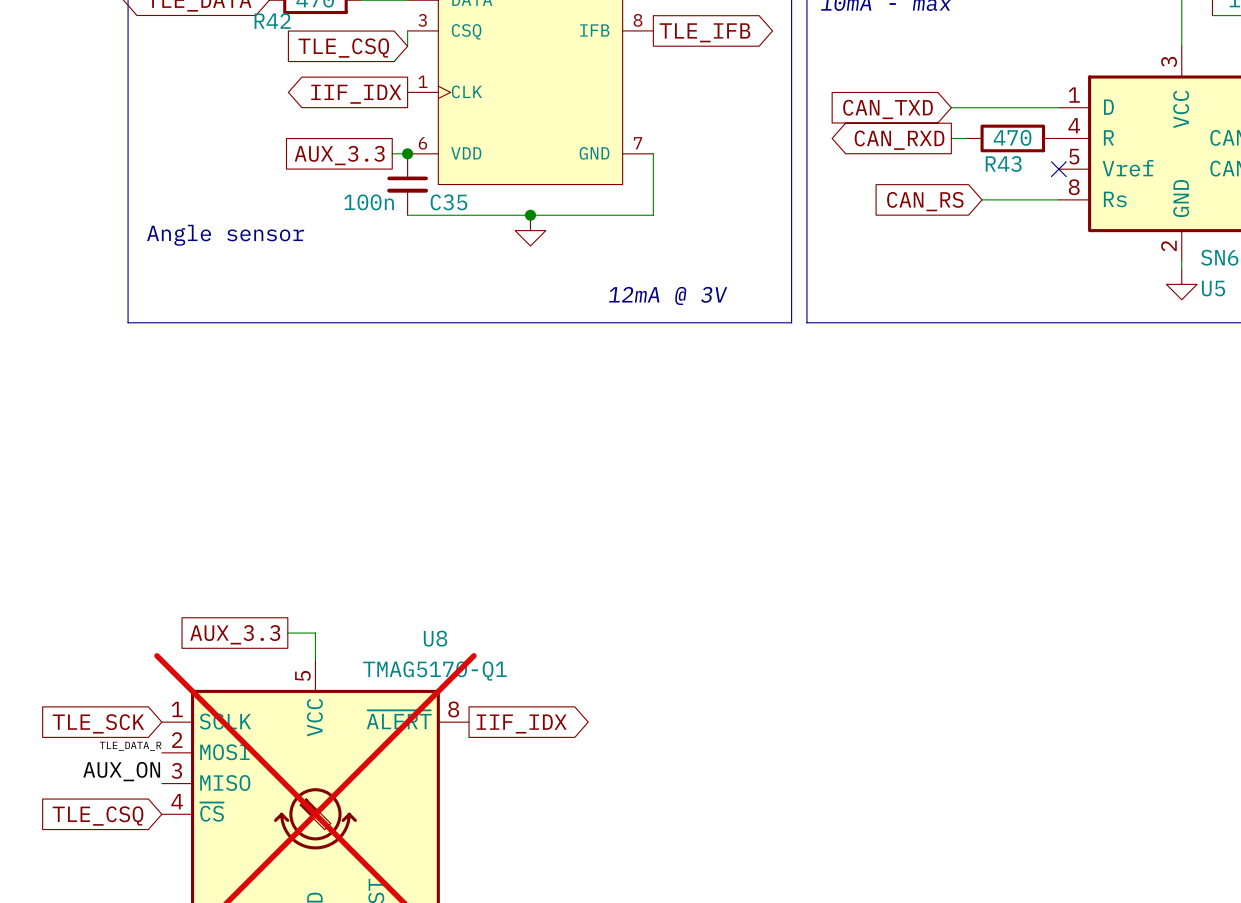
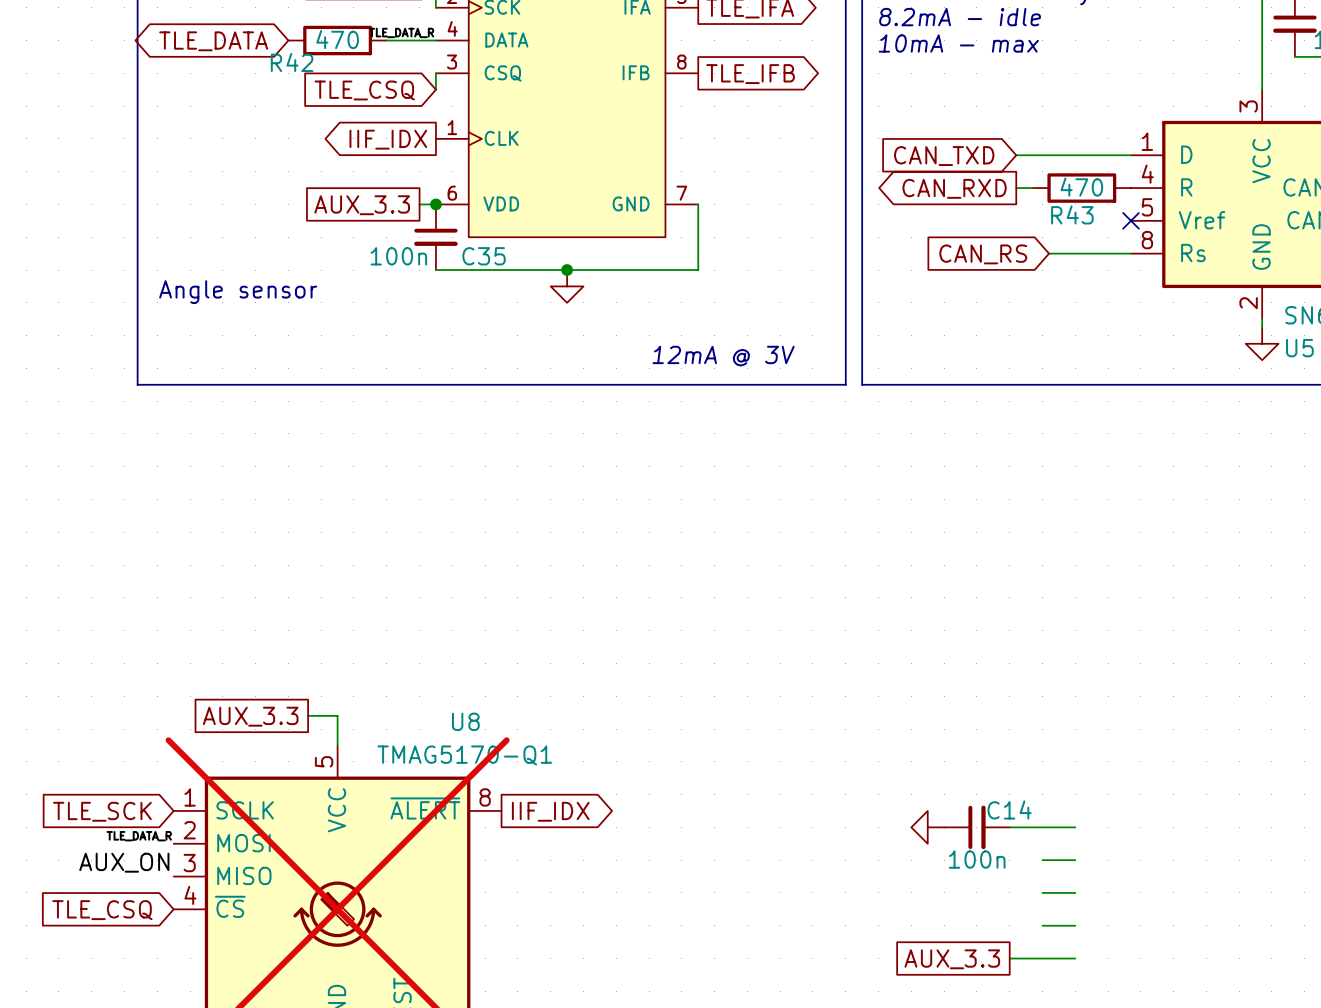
power symbol: none -> (927, 827)
C14: none -> 100n (976, 827)
wire: none -> (1009, 827) (1075, 827)
wire: none -> (1042, 860) (1075, 860)
wire: none -> (1042, 892) (1075, 892)
wire: none -> (1042, 925) (1075, 925)
wire: none -> (1009, 958) (1075, 958)
global label: none -> AUX_3.3 (952, 959)

